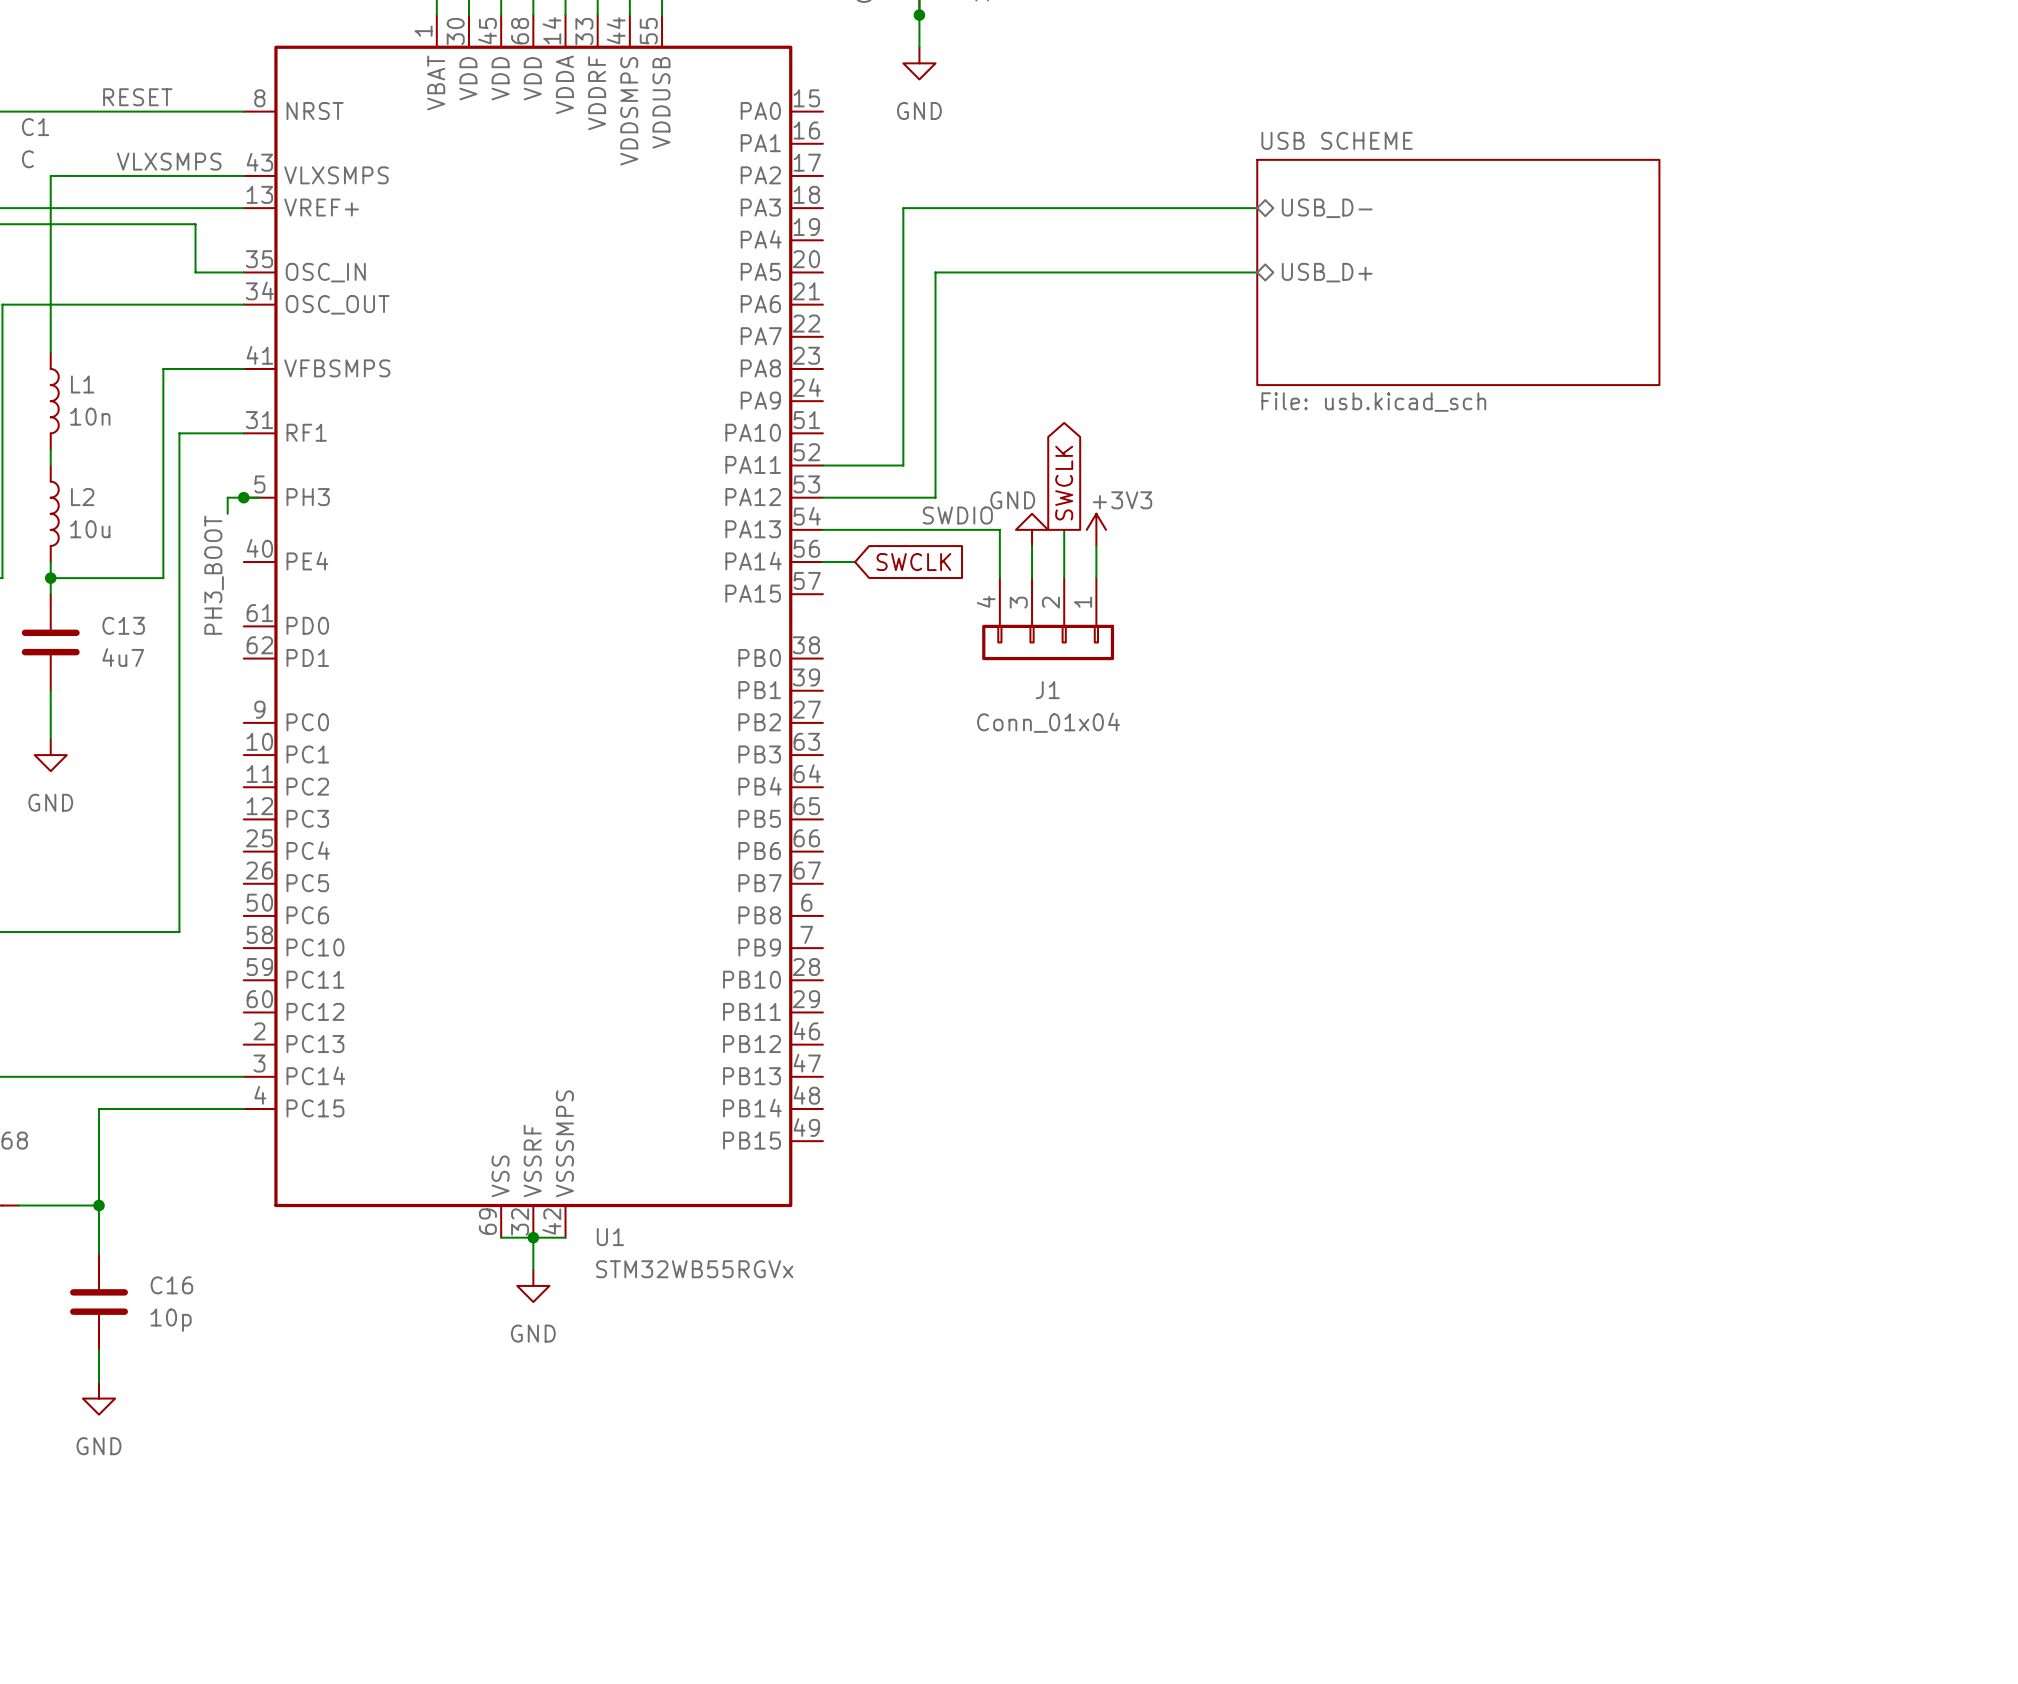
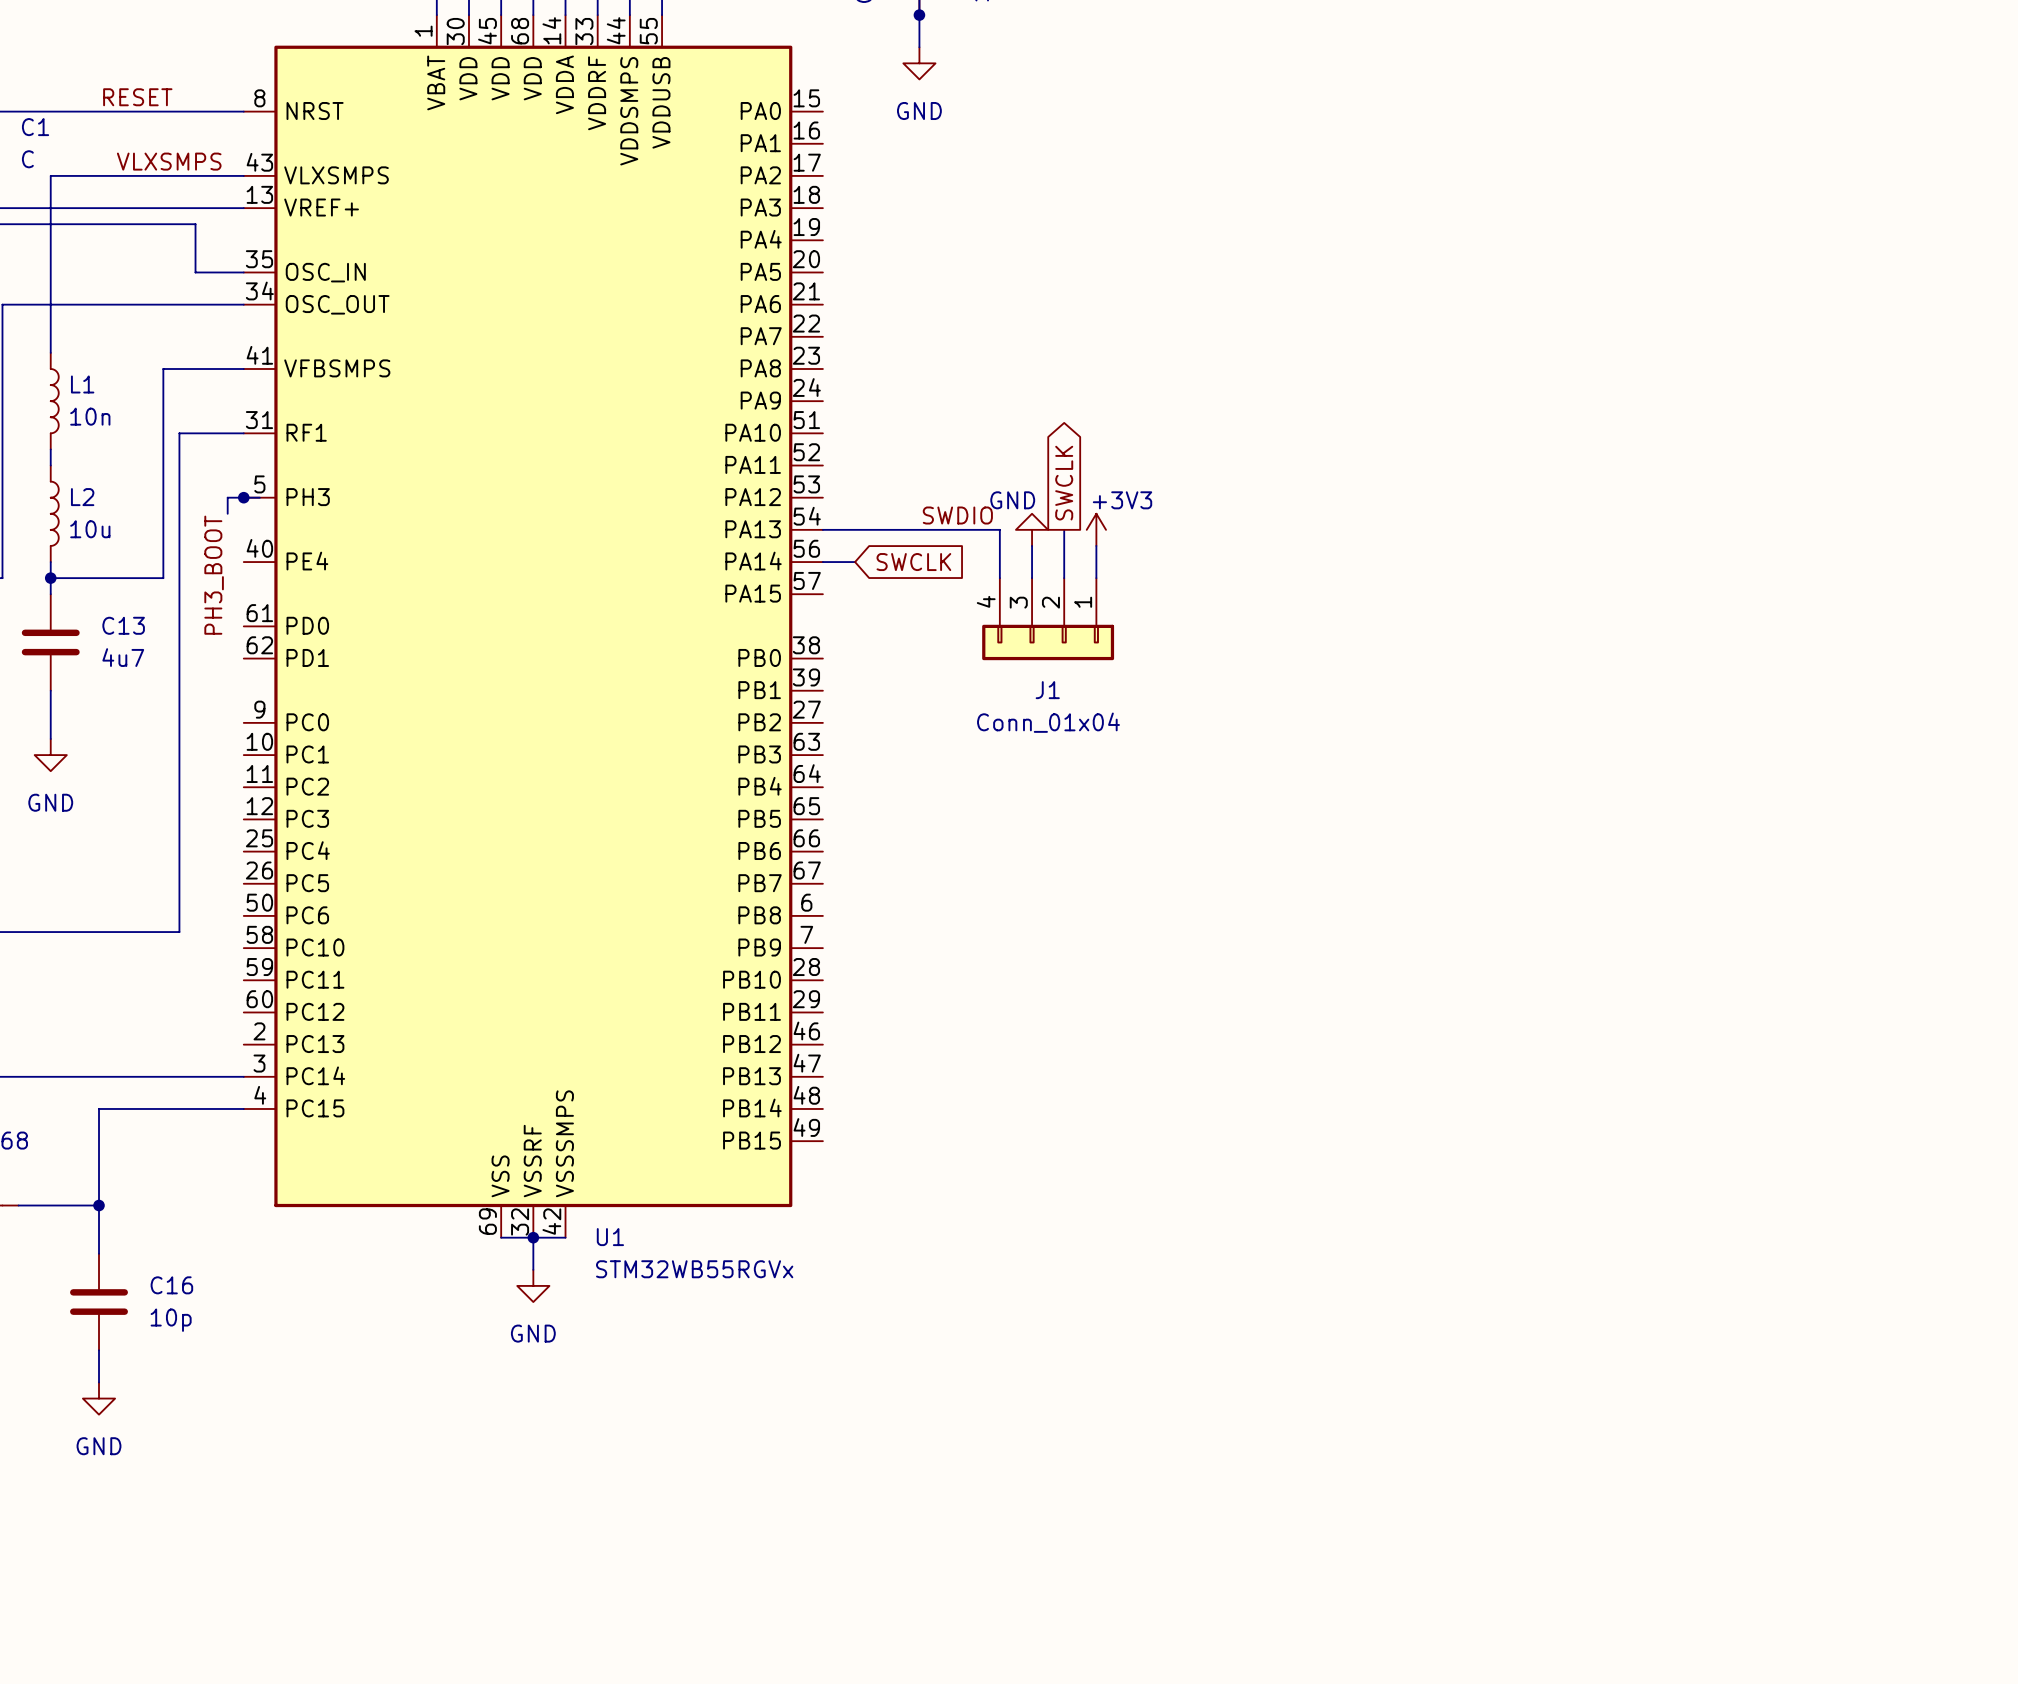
wire: (1257, 208) (903, 208) (903, 465) (822, 465) -> none
hierarchical label: USB_D- (1327, 208) -> none
wire: (1257, 272) (935, 272) (935, 497) (822, 497) -> none
hierarchical label: USB_D+ (1327, 272) -> none
sheet USB SCHEME: File: usb.kicad_sch (1458, 272) -> none

